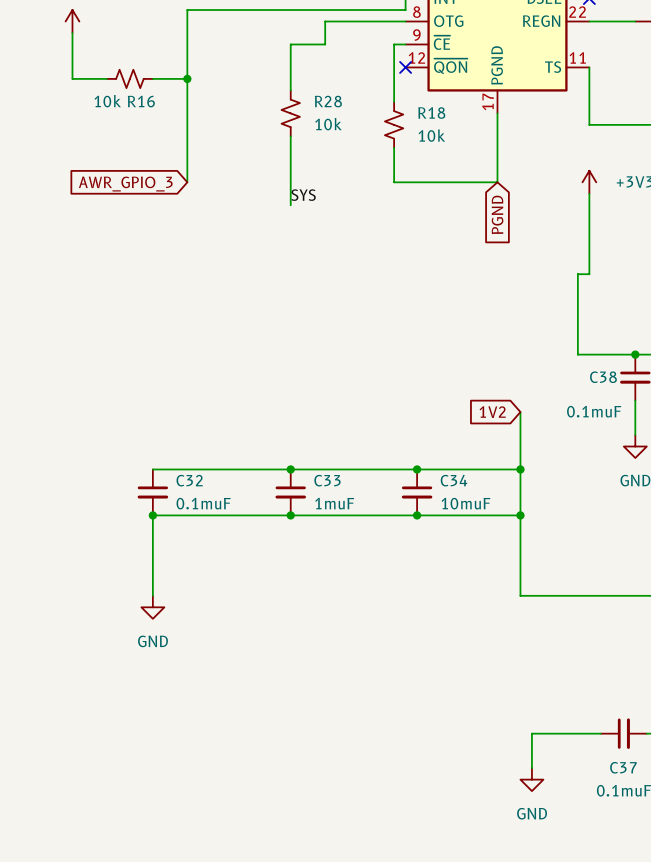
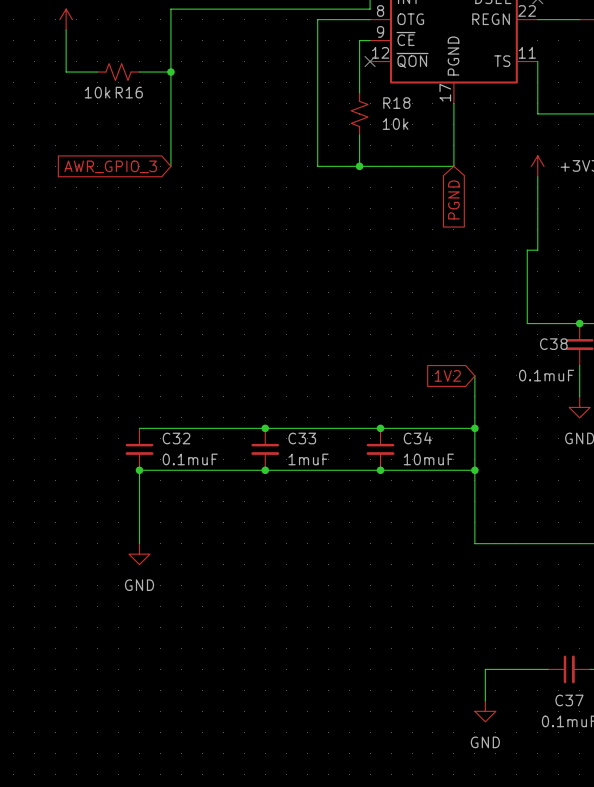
wire: (348, 21) (325, 21) (325, 44) (290, 44) (290, 90) -> (317, 19) (317, 166) (359, 166)
R28: 10k (290, 113) -> none
wire: (290, 136) (290, 205) -> none
junction: none -> (359, 166)
label: SYS (303, 195) -> none

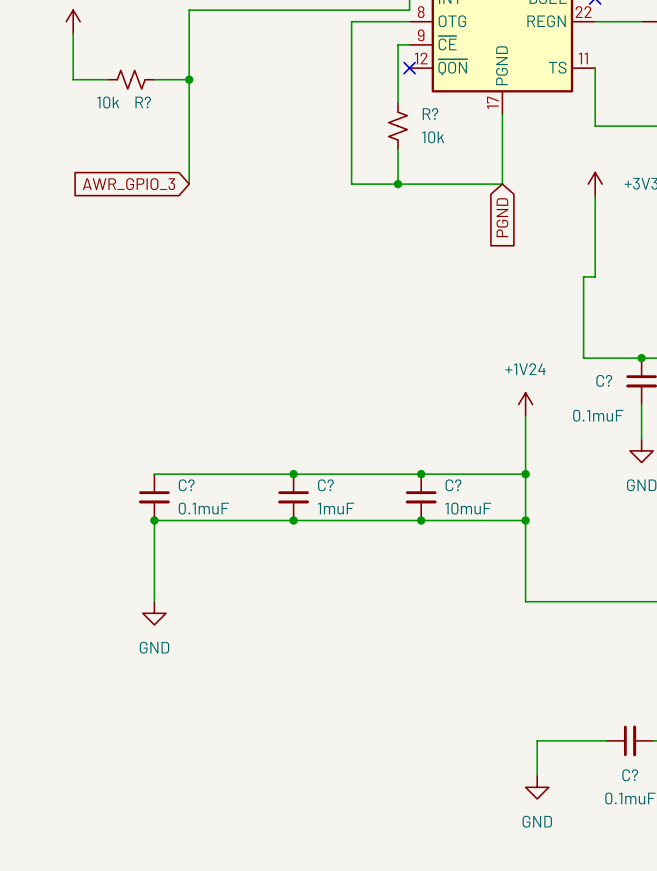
R16 name: R16 (129, 92) -> R? (143, 102)
R18 name: R18 (396, 103) -> R? (430, 114)
C38 name: C38 (553, 344) -> C? (604, 380)
power symbol: none -> +1V24 (525, 404)
global label: 1V2 (447, 375) -> none
C32 name: C32 (176, 438) -> C? (186, 485)
C33 name: C33 (302, 438) -> C? (325, 485)
C34 name: C34 (417, 438) -> C? (453, 485)
C37 name: C37 (569, 700) -> C? (630, 775)

